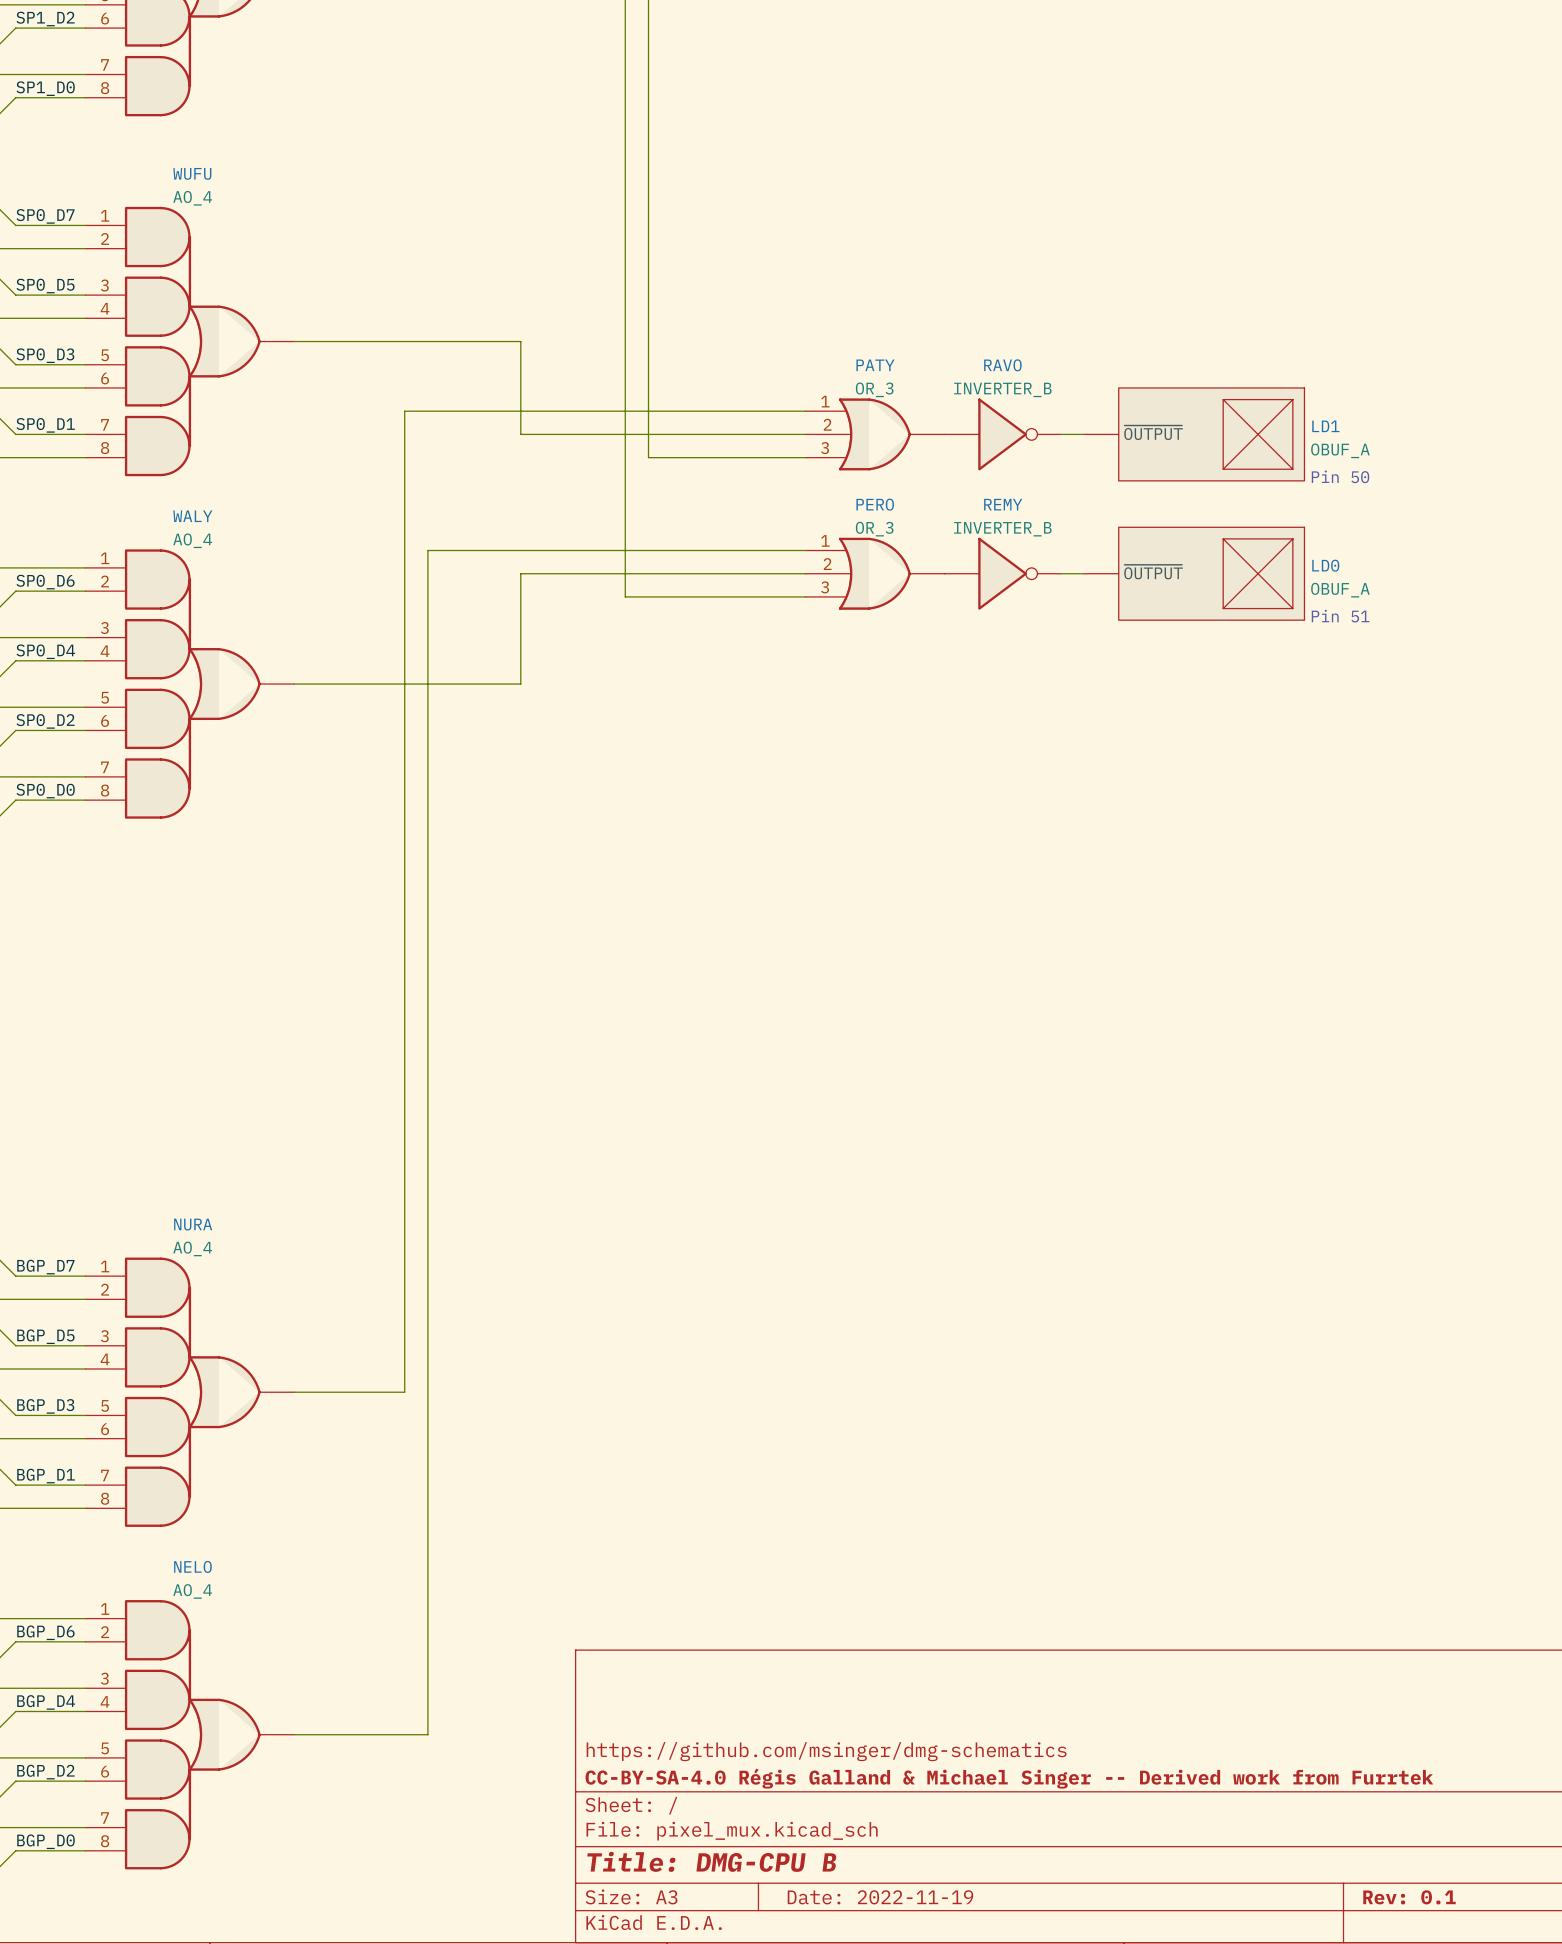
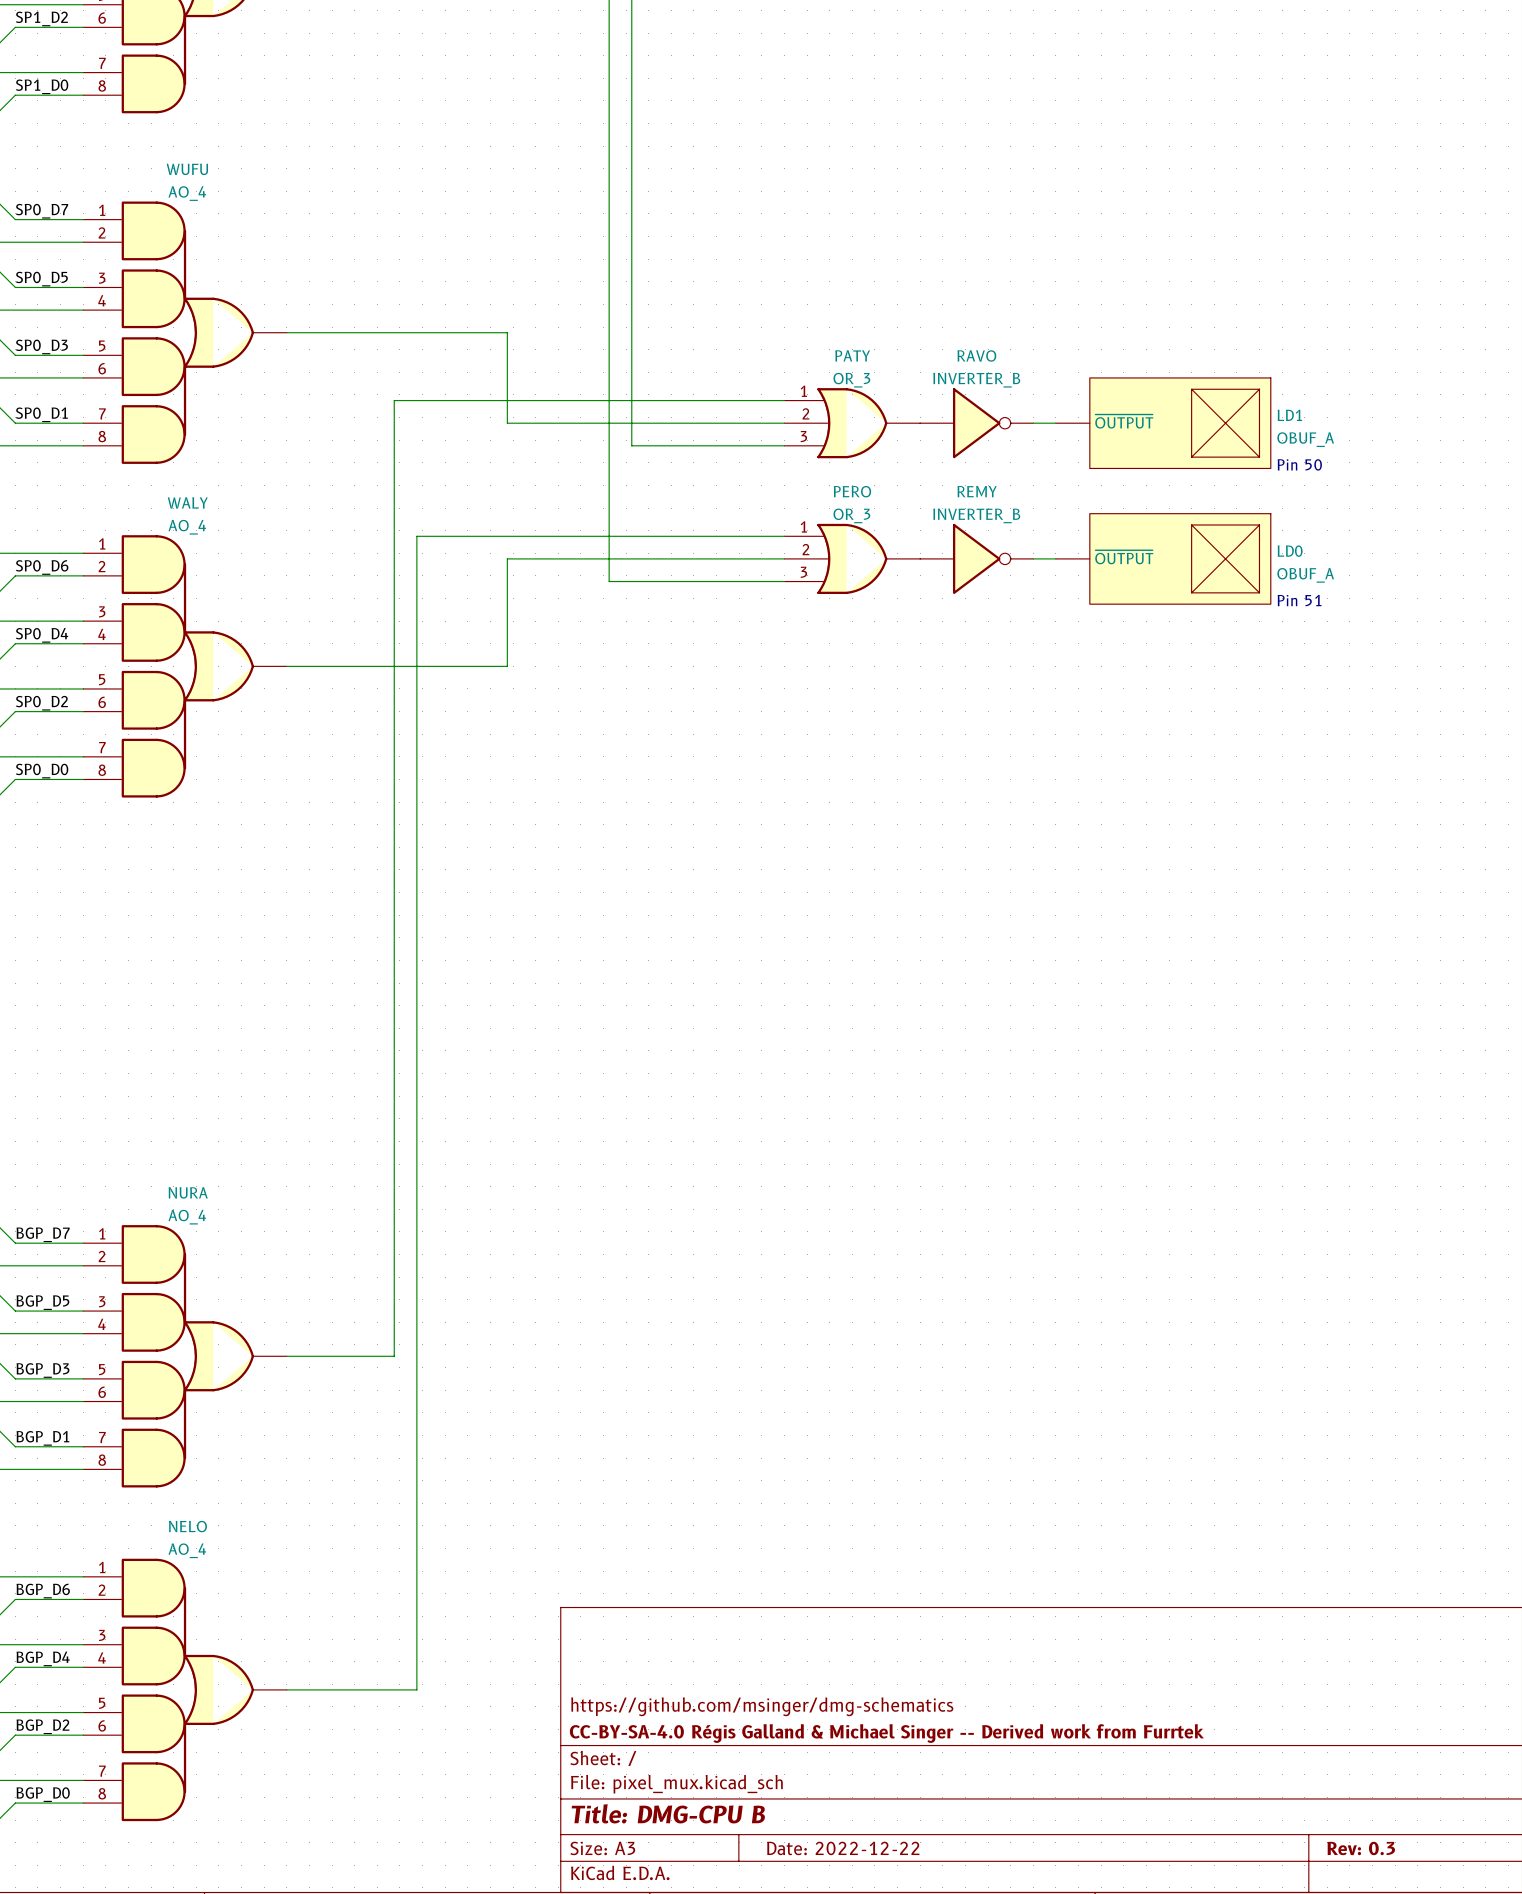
title block: Date: 2022-11-19 (880, 1897) -> Date: 2022-12-22 (843, 1848)
title block: Rev: 0.1 (1409, 1897) -> Rev: 0.3 (1361, 1848)

